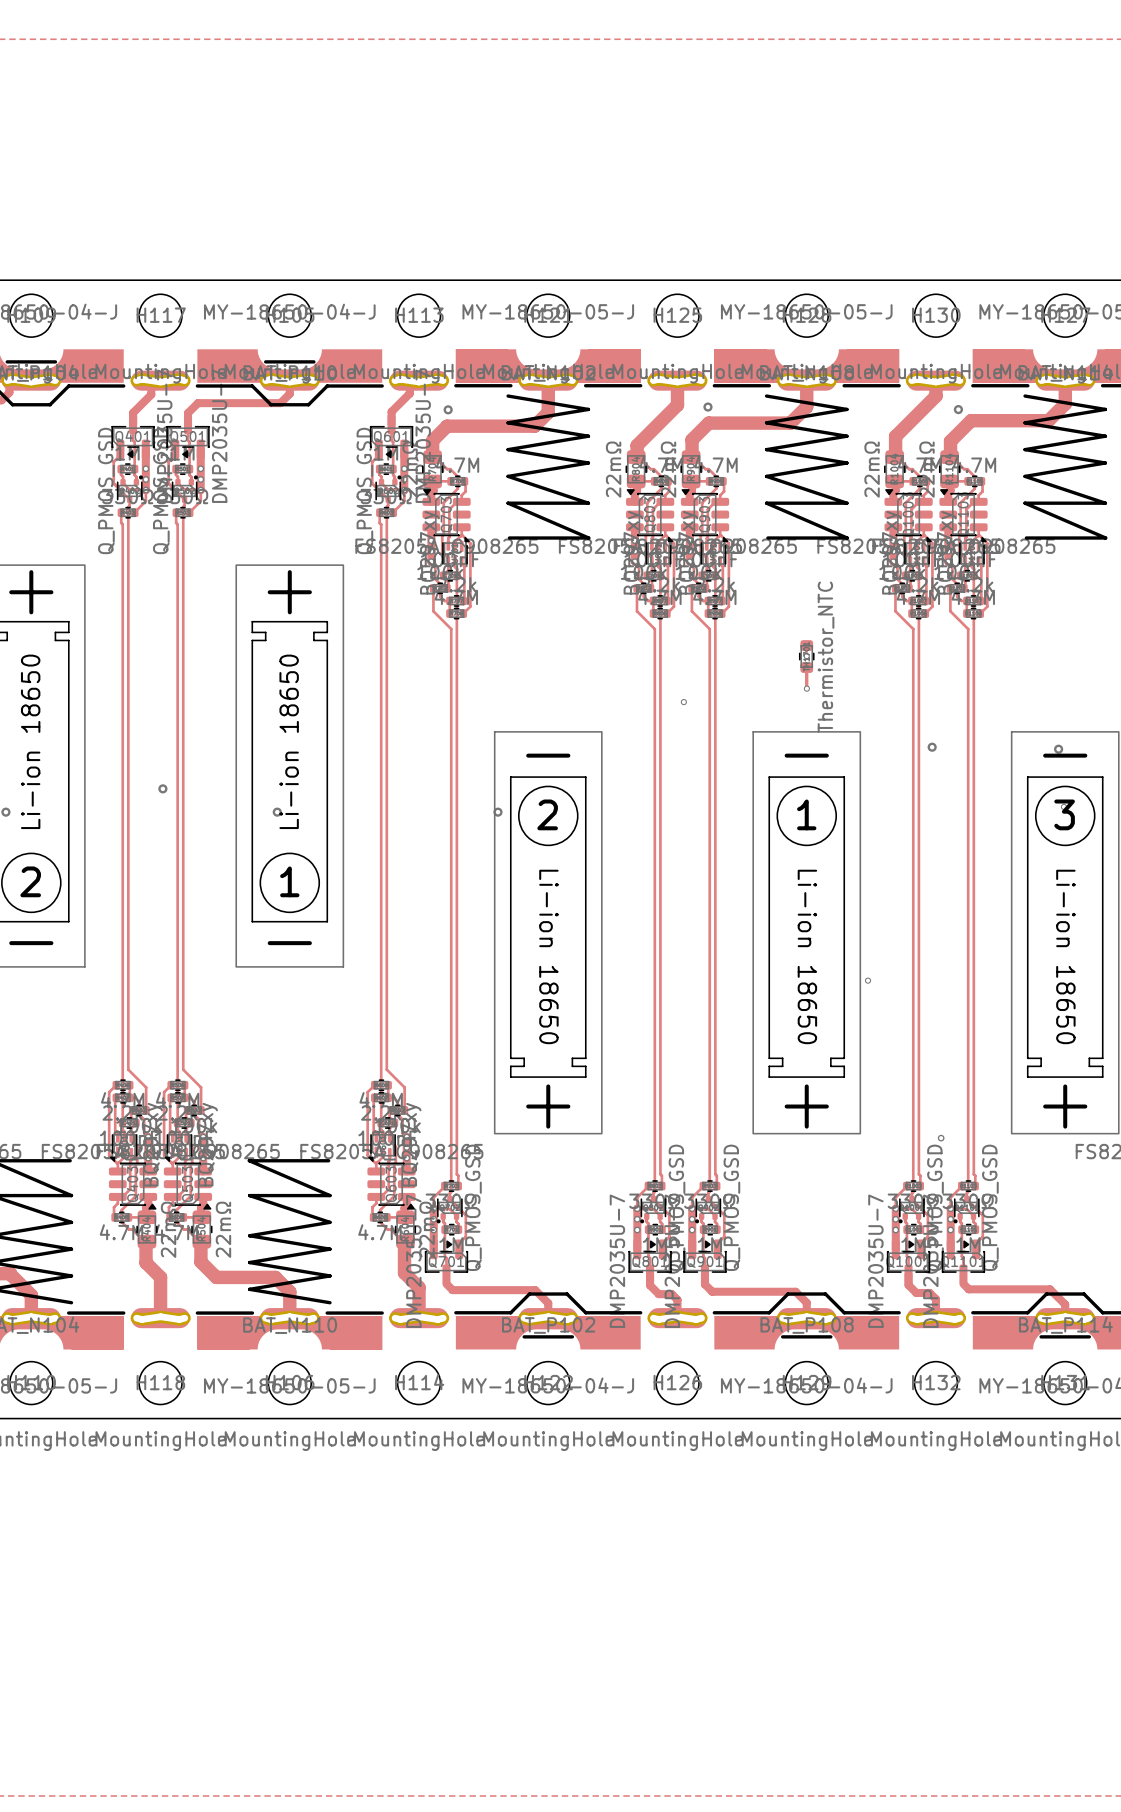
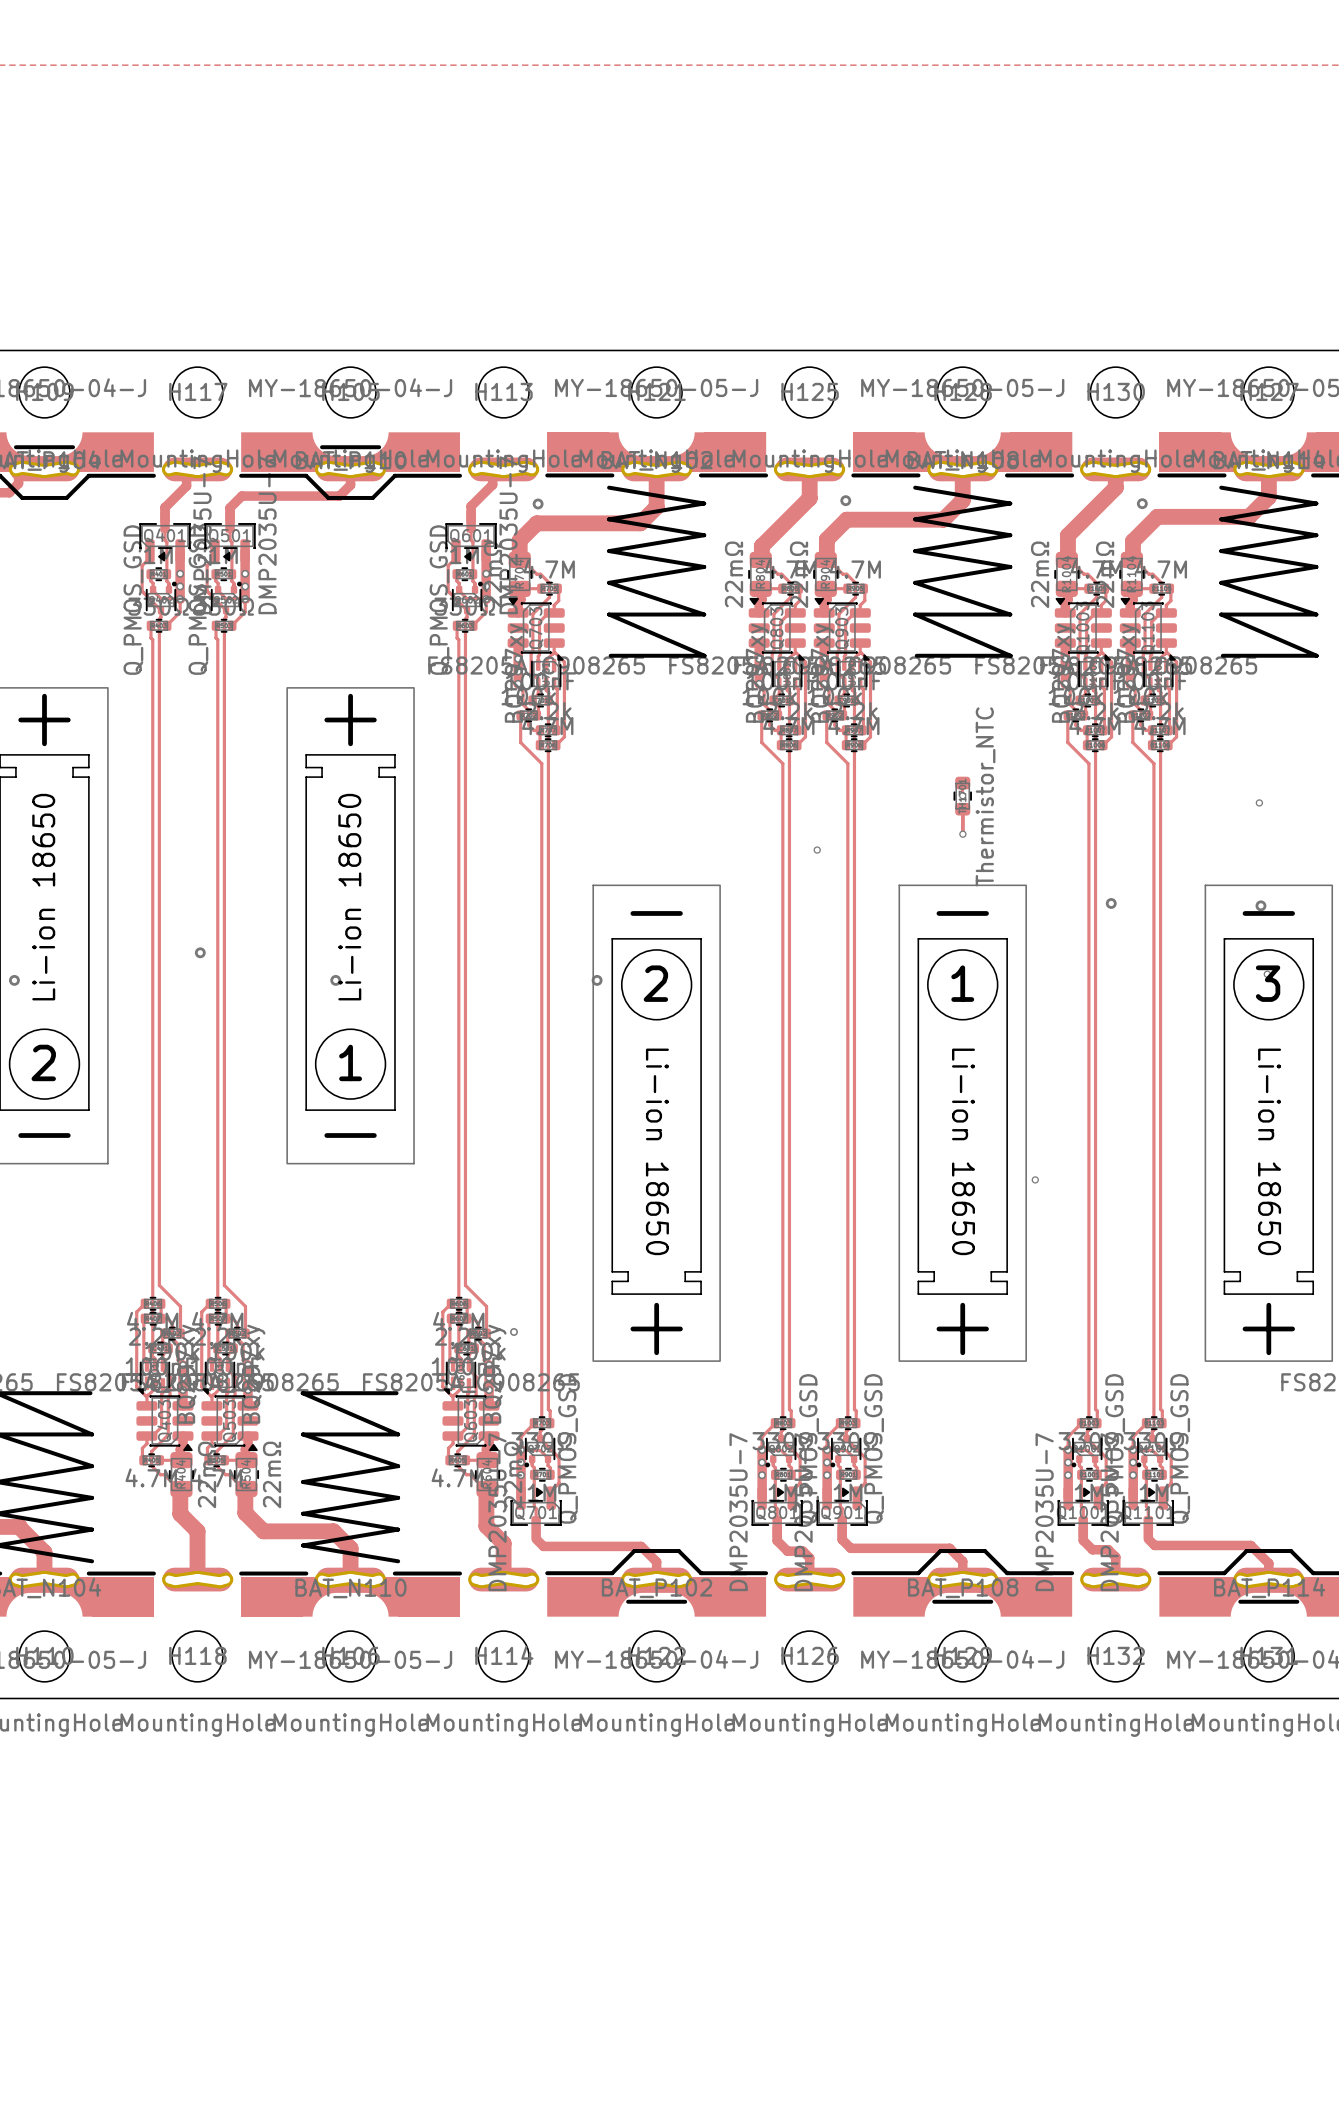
via: none -> (1259, 802)
via: none -> (514, 1331)
via: (941, 1138) -> none

